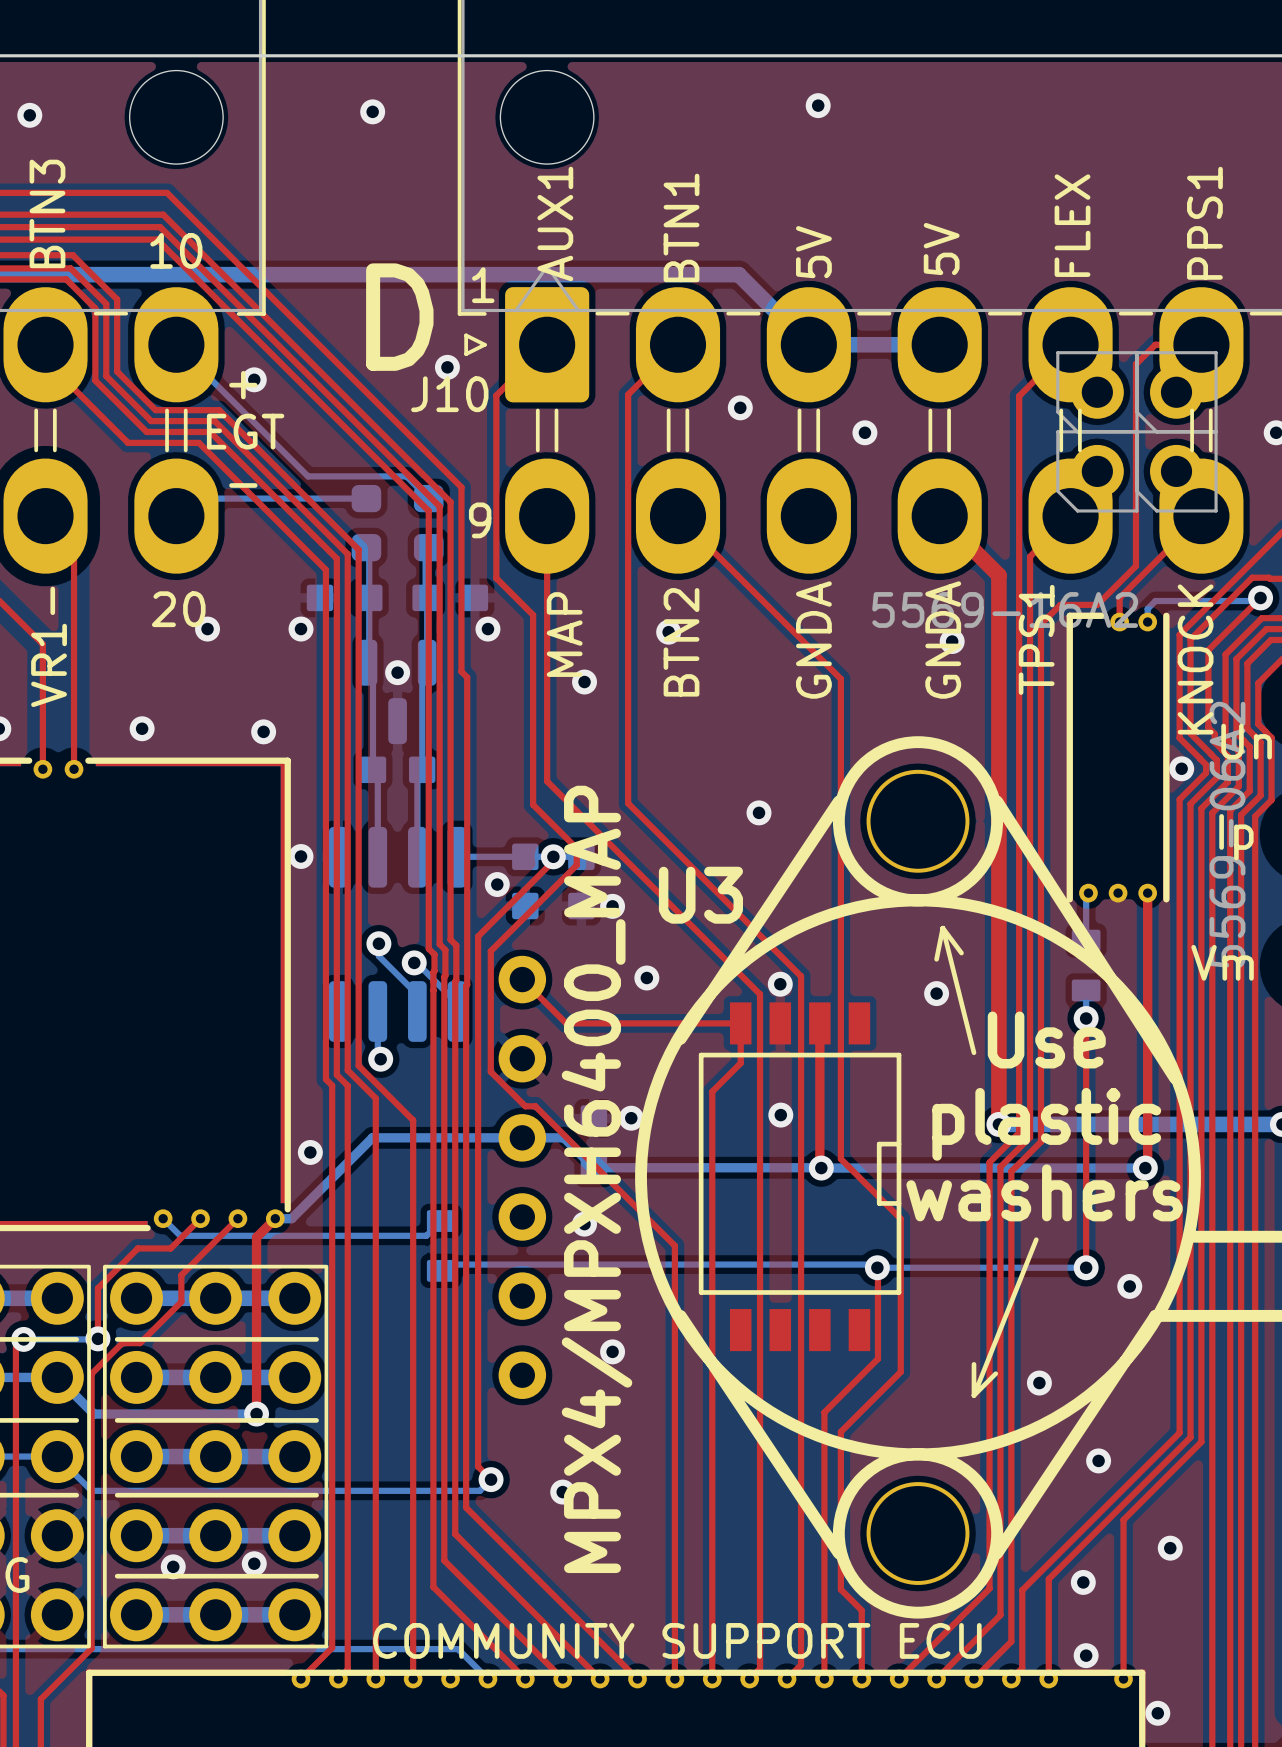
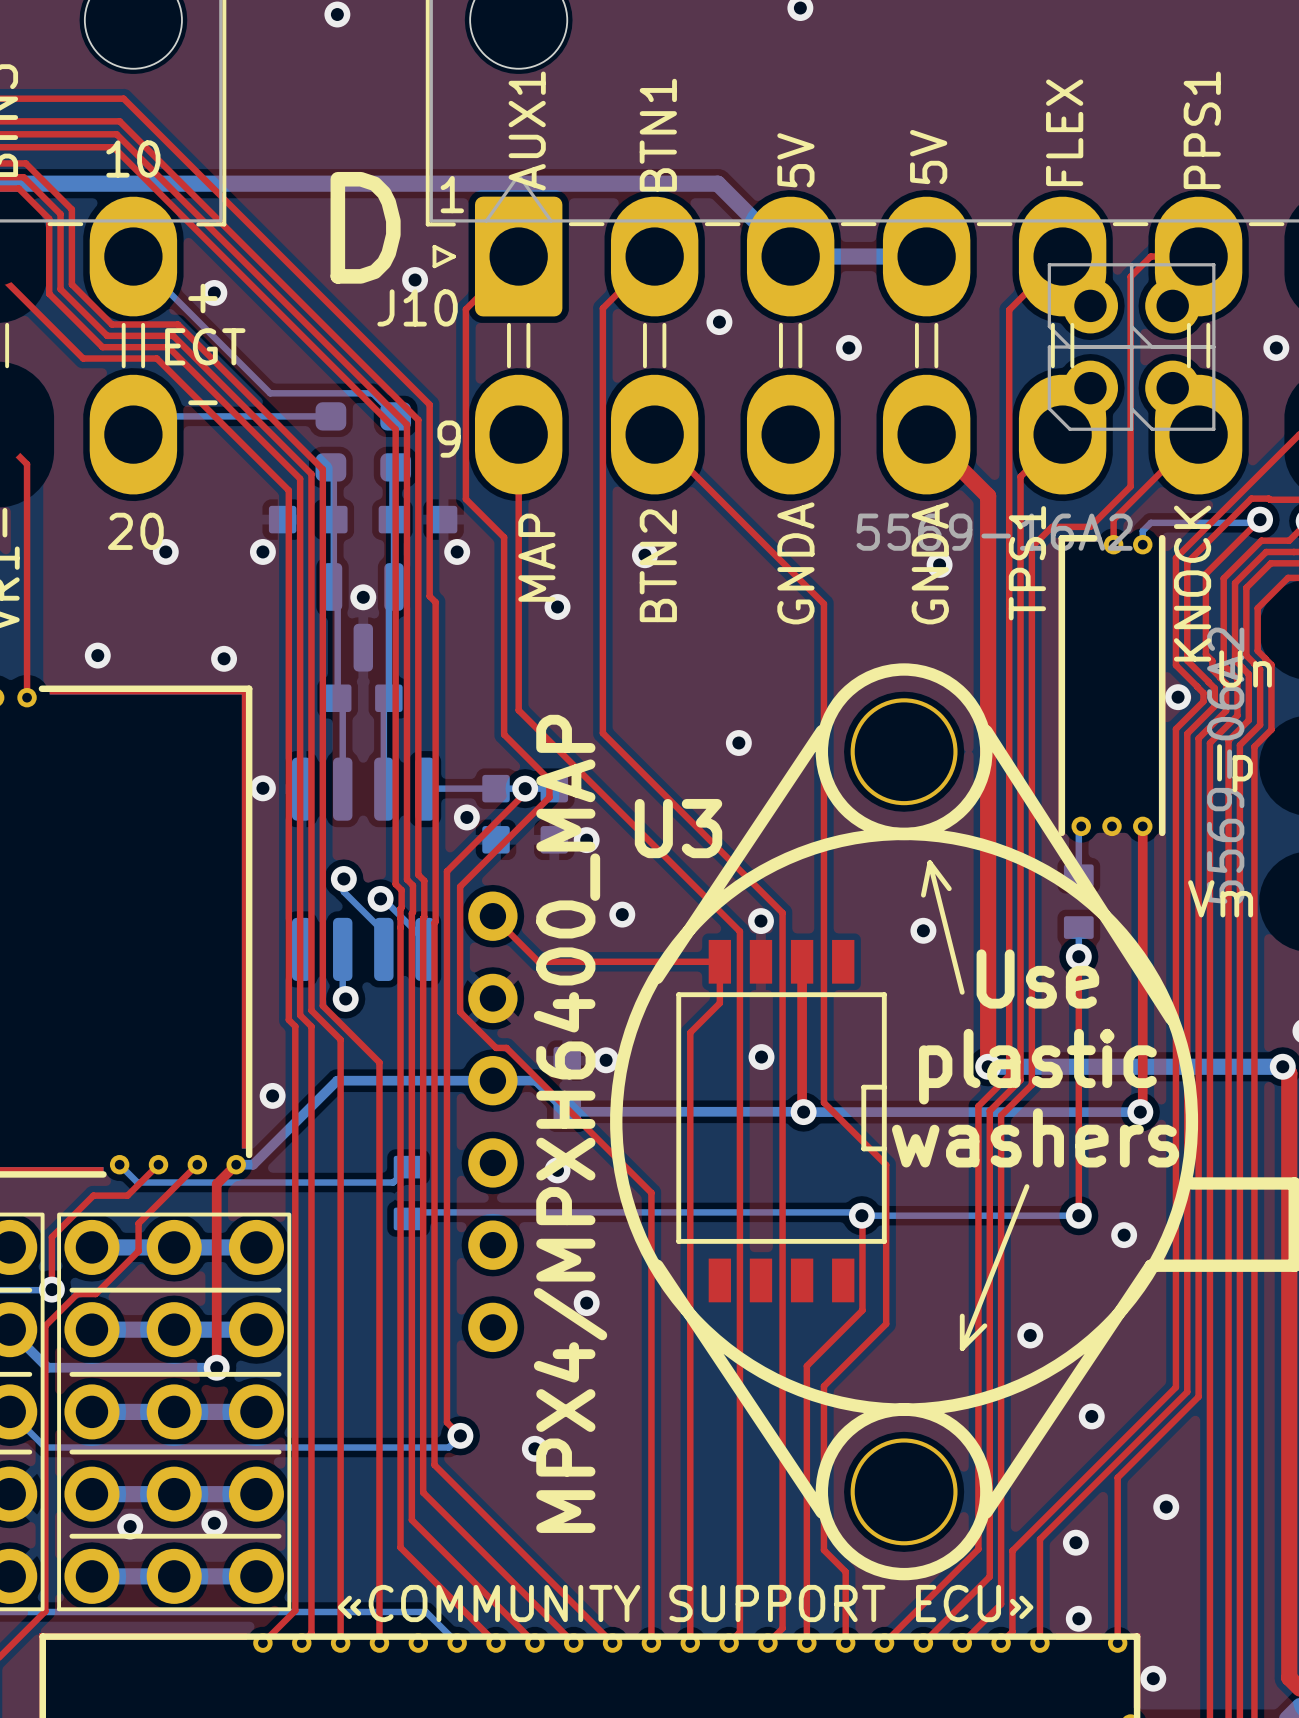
text: COMMUNITY SUPPORT ECU (677, 1640) -> «COMMUNITY SUPPORT ECU» (685, 1603)

